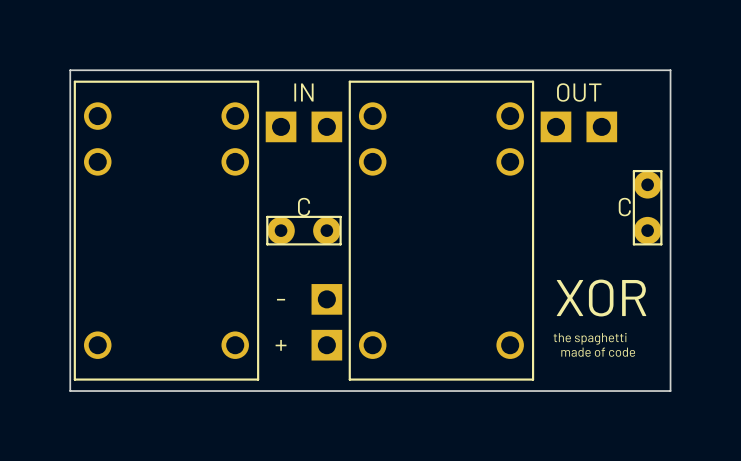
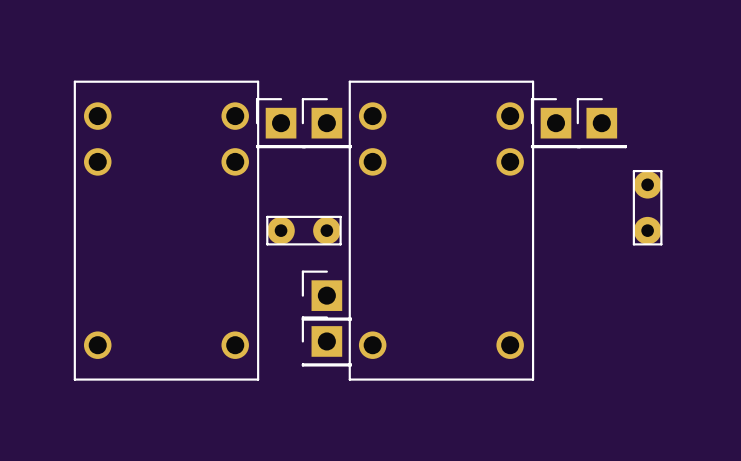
board edge: (70, 70) (70, 391) (670, 391) (670, 70) (70, 70) -> none
text: IN (303, 92) -> none
text: OUT (579, 92) -> none
part side: bottom (281, 126) -> top (281, 123)
part side: bottom (326, 126) -> top (326, 123)
part side: bottom (555, 126) -> top (555, 123)
part side: bottom (601, 126) -> top (601, 123)
text: C (304, 207) -> none
text: C (624, 207) -> none
text: XOR (601, 298) -> none
text: - (281, 299) -> none
part side: bottom (326, 299) -> top (326, 295)
text: the spaghetti (590, 338) -> none
text: + (281, 345) -> none
part side: bottom (326, 345) -> top (326, 341)
text: made of code (598, 352) -> none

